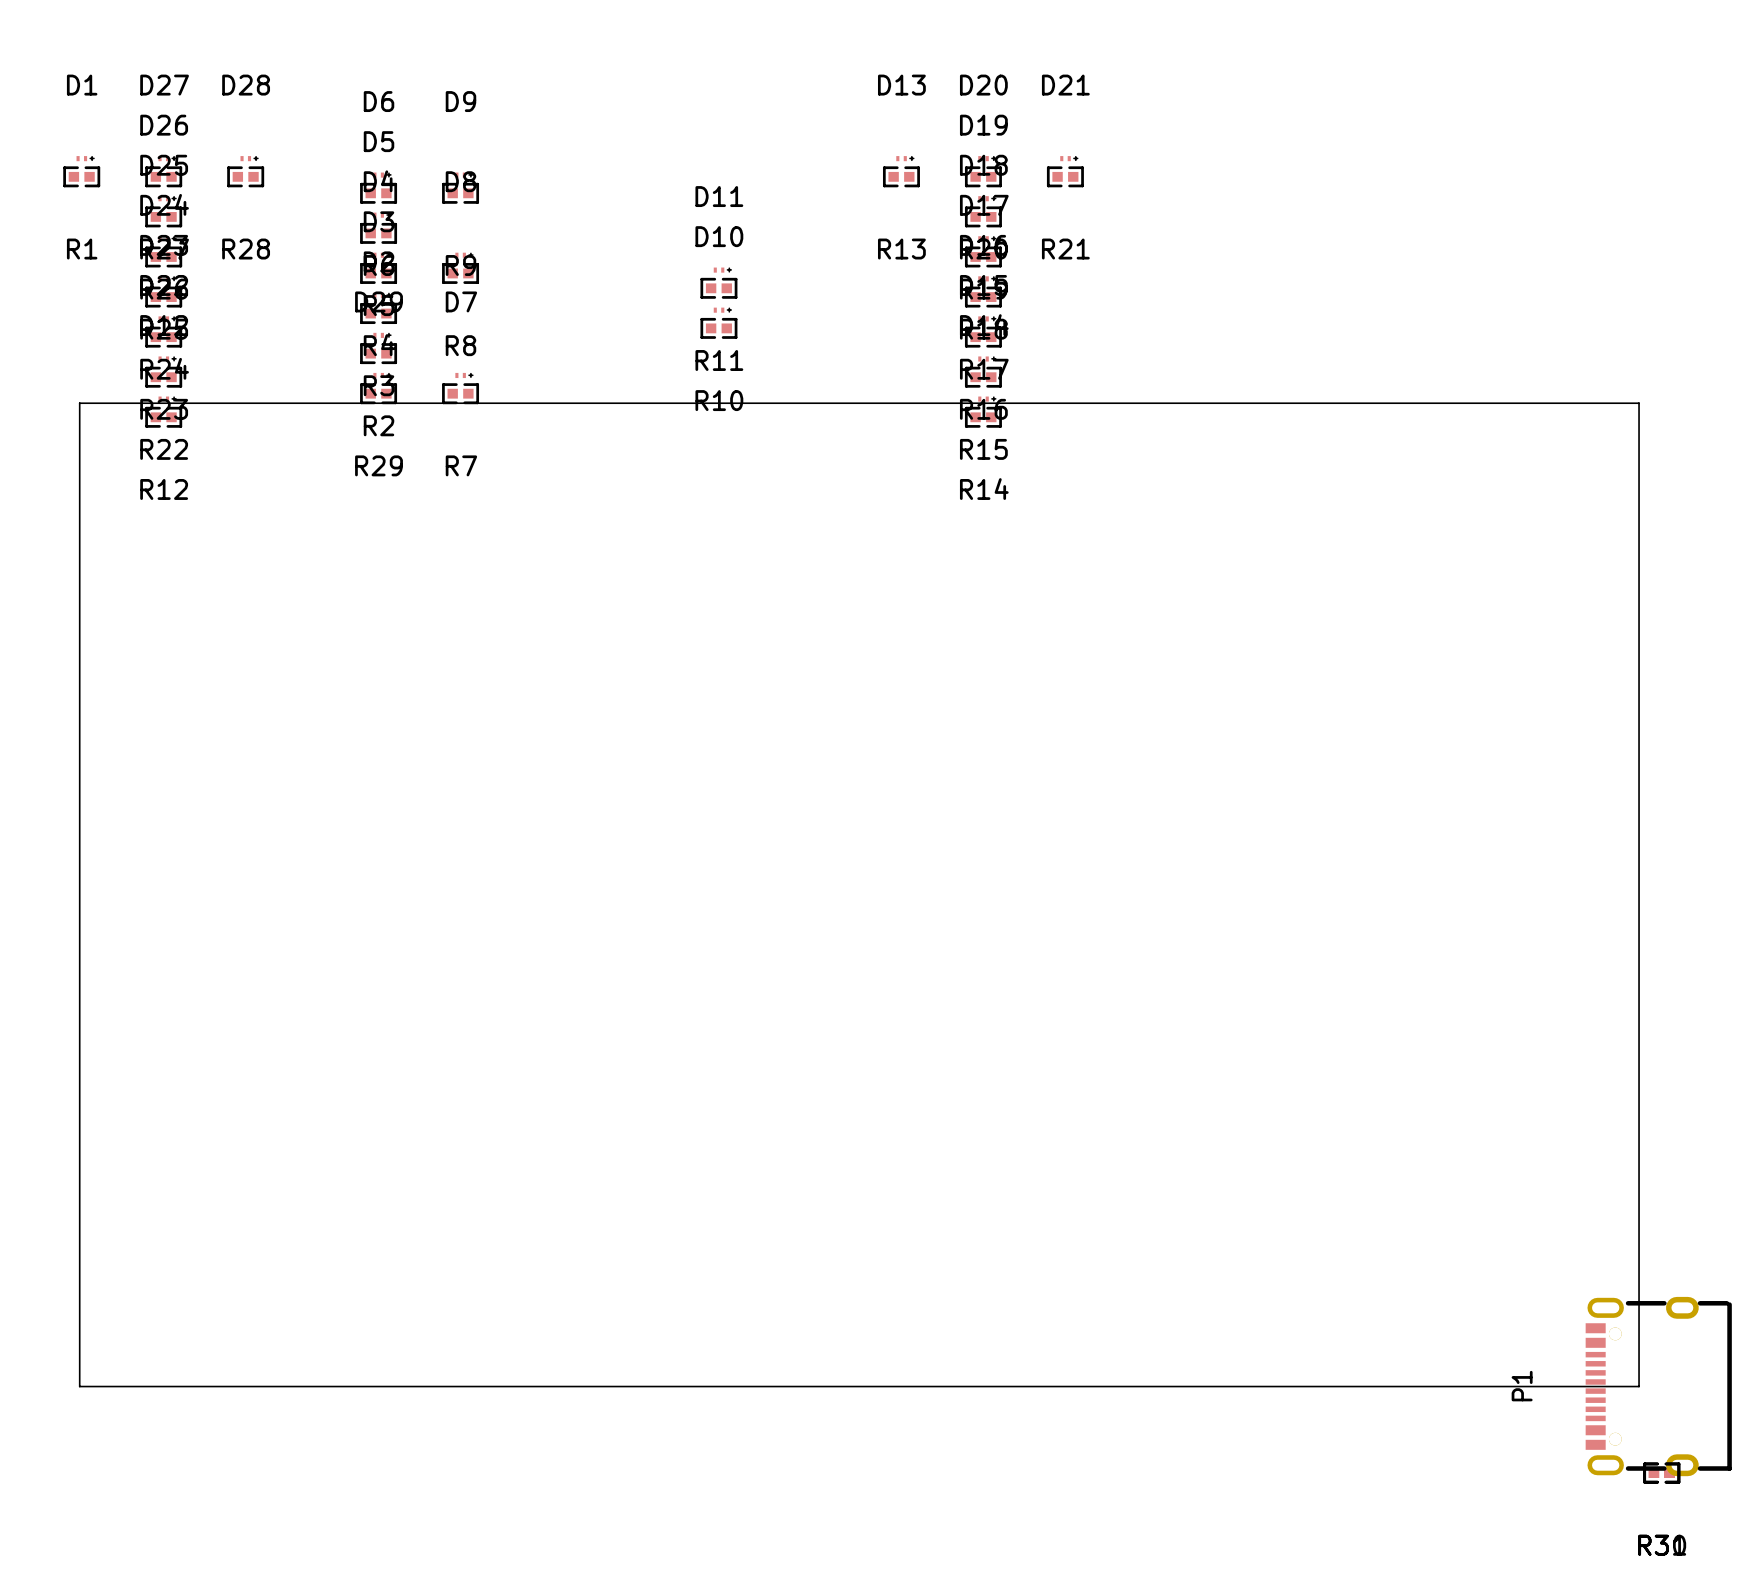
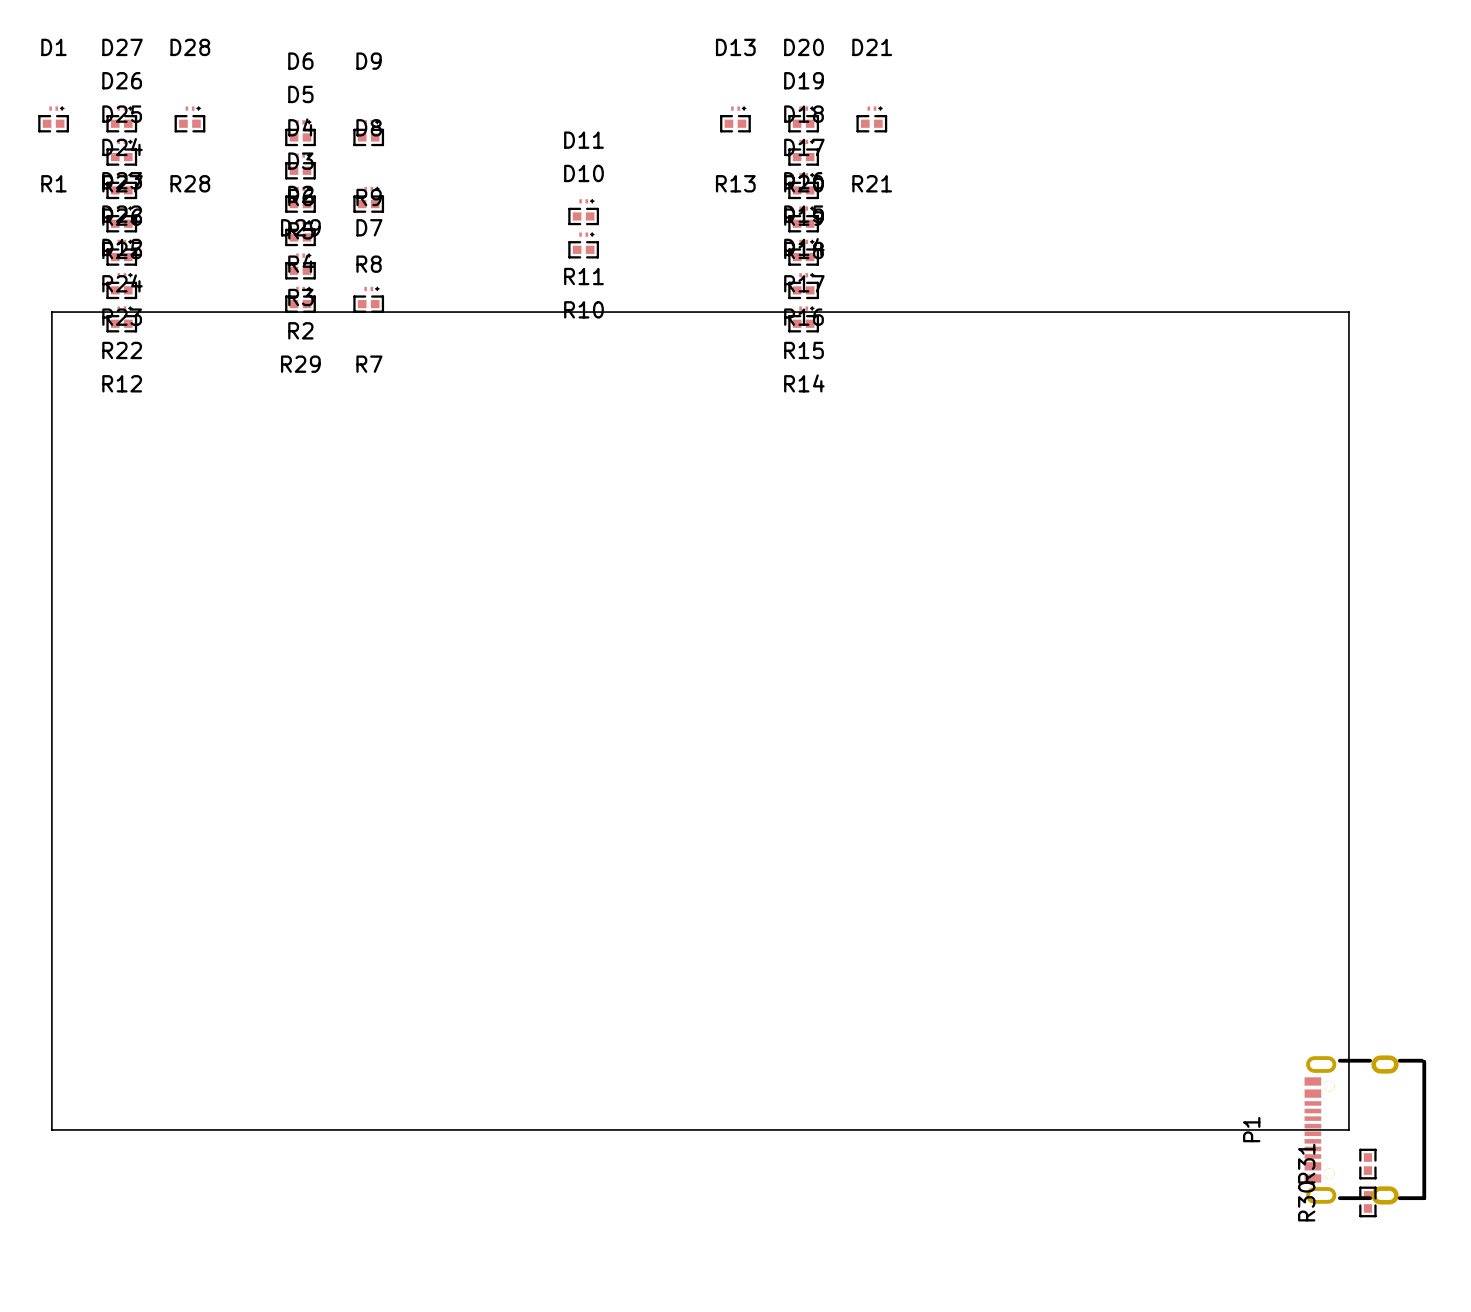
R31 rotation: 0° (1661, 1473) -> 90° clockwise (1367, 1164)
R31 position: (1661, 1473) -> (1367, 1164)
R30 rotation: 0° (1661, 1473) -> 90° clockwise (1367, 1201)

